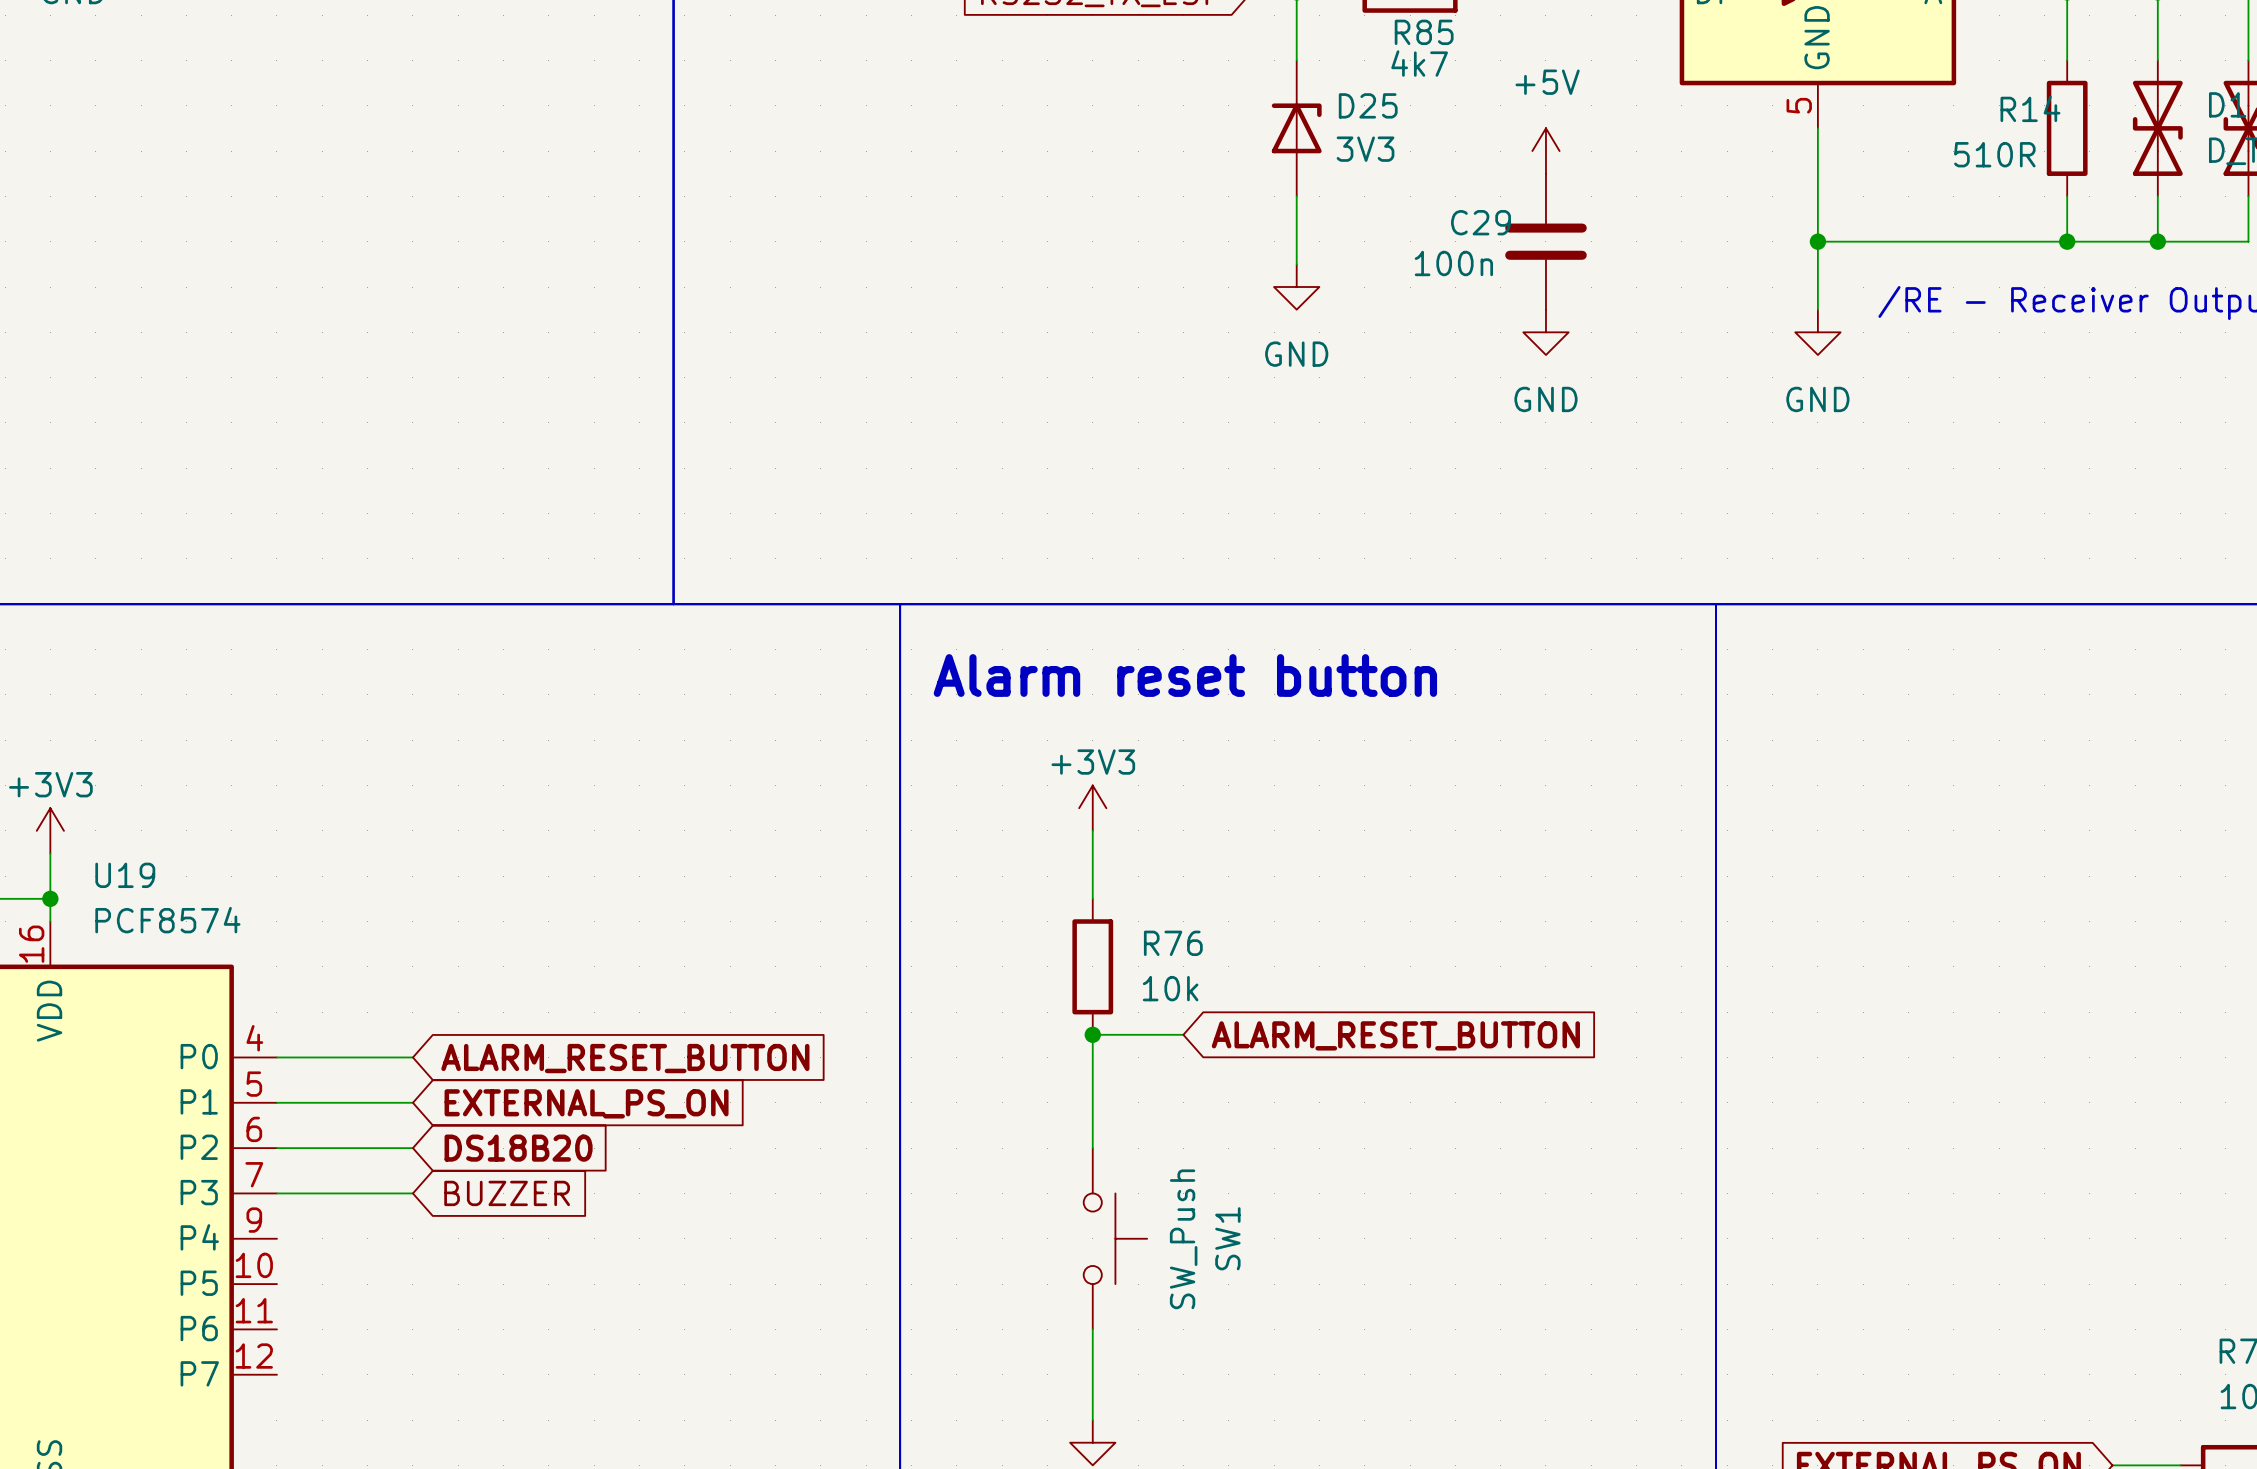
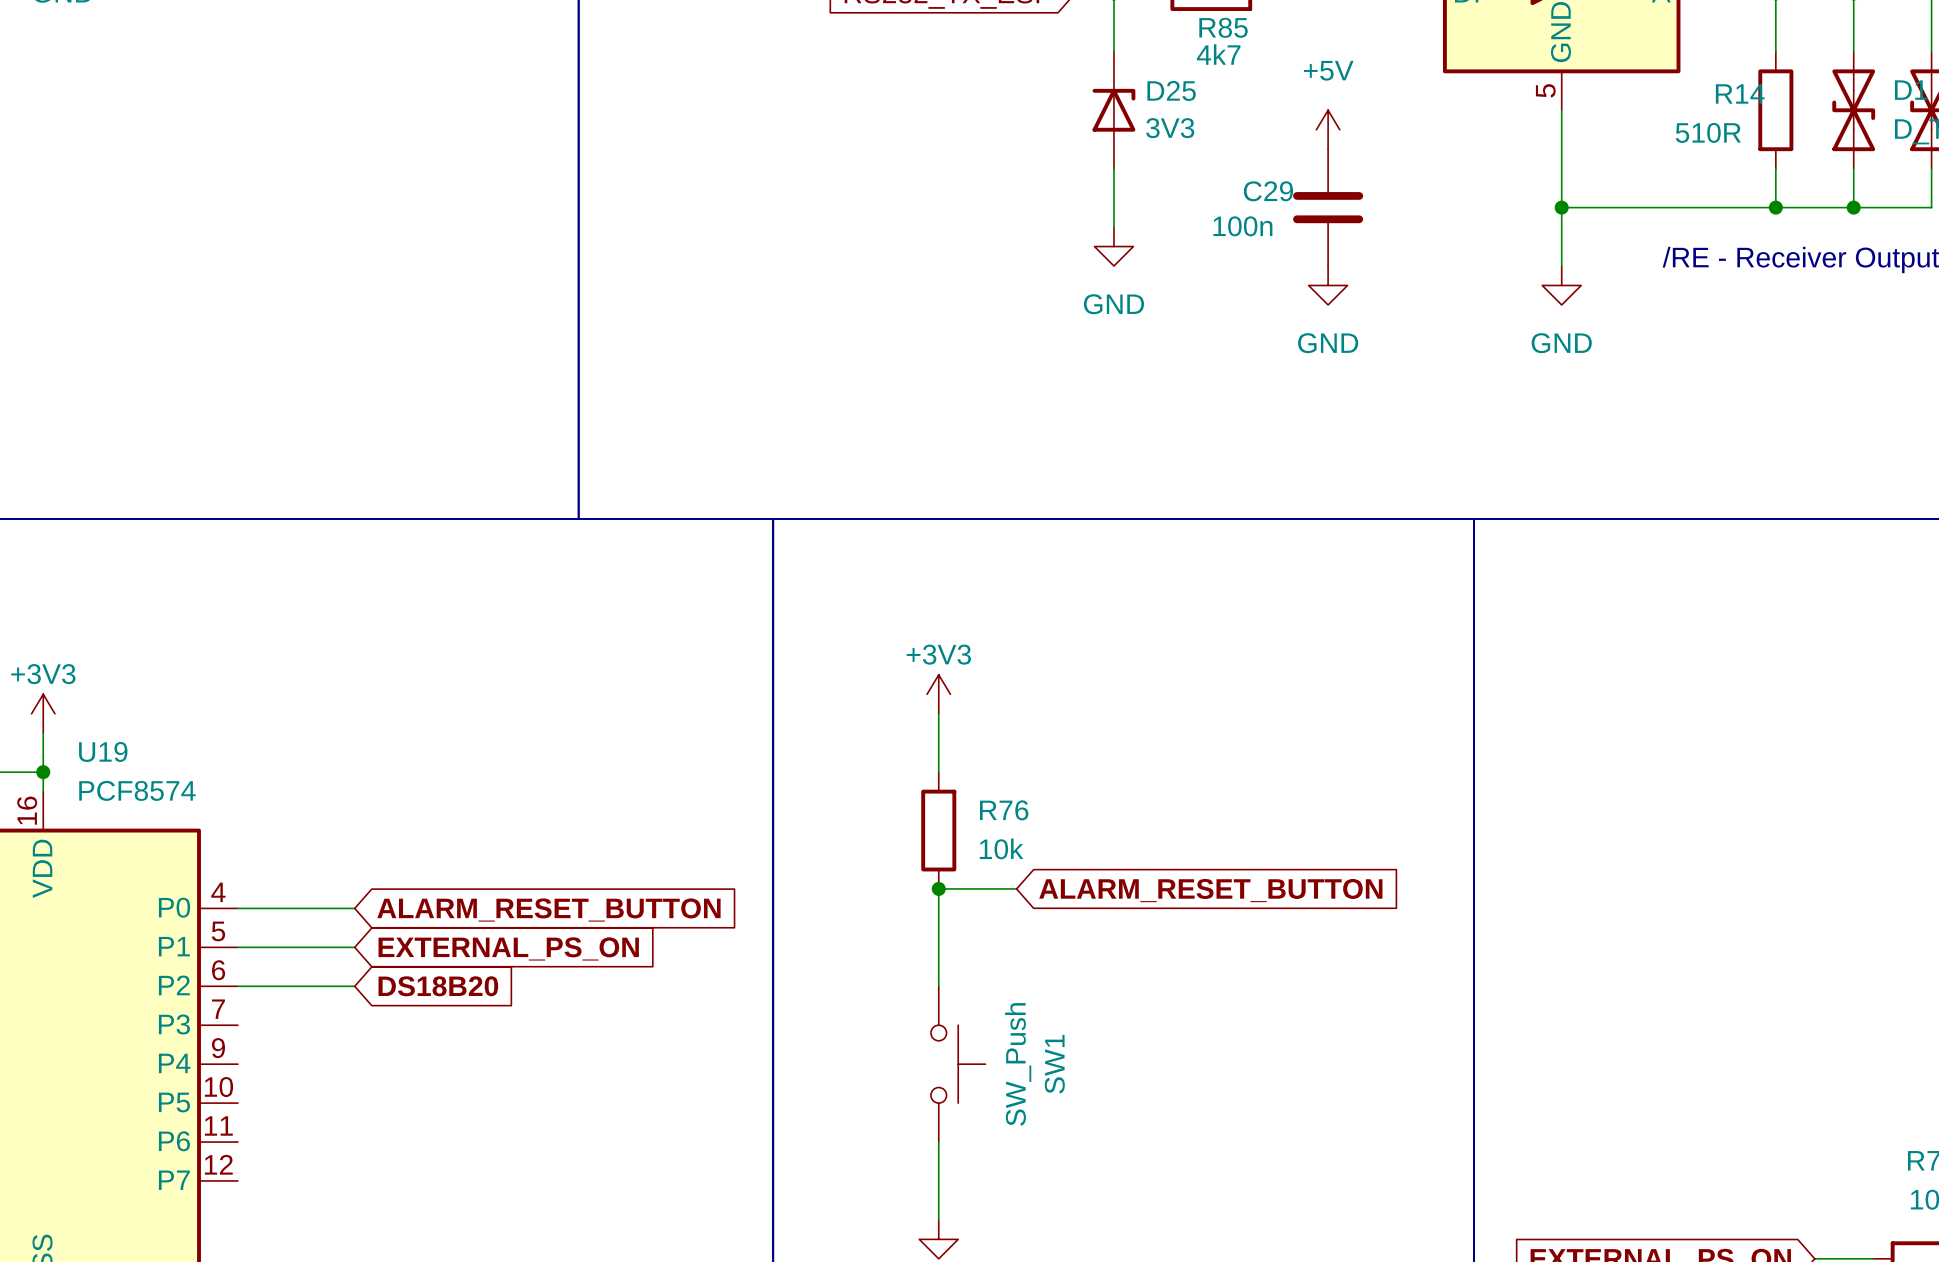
text: Alarm reset button (1185, 675) -> none
wire: (276, 1193) (412, 1193) -> none
global label: BUZZER (507, 1193) -> none

